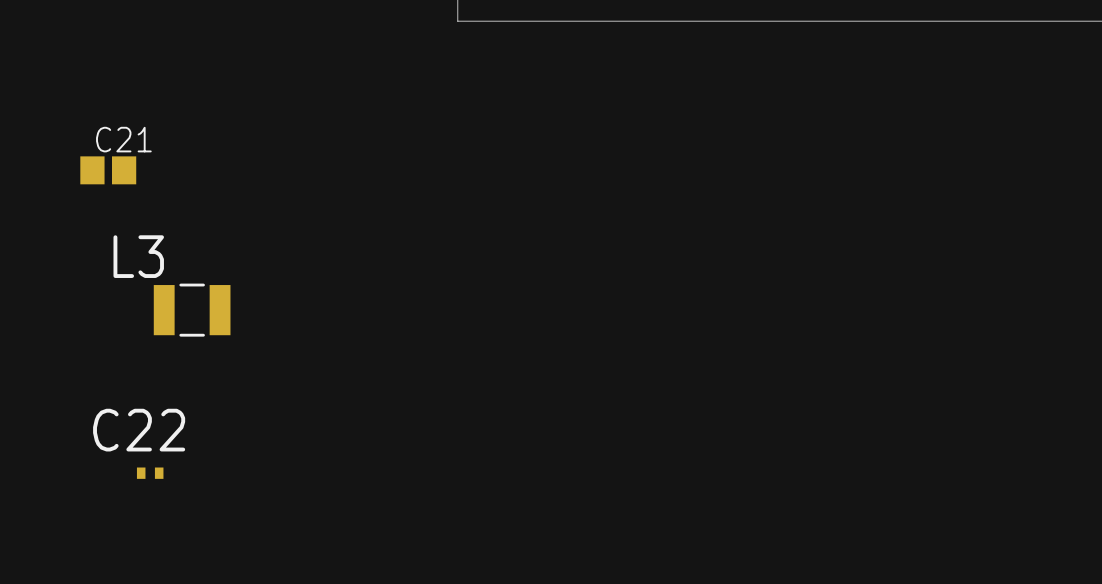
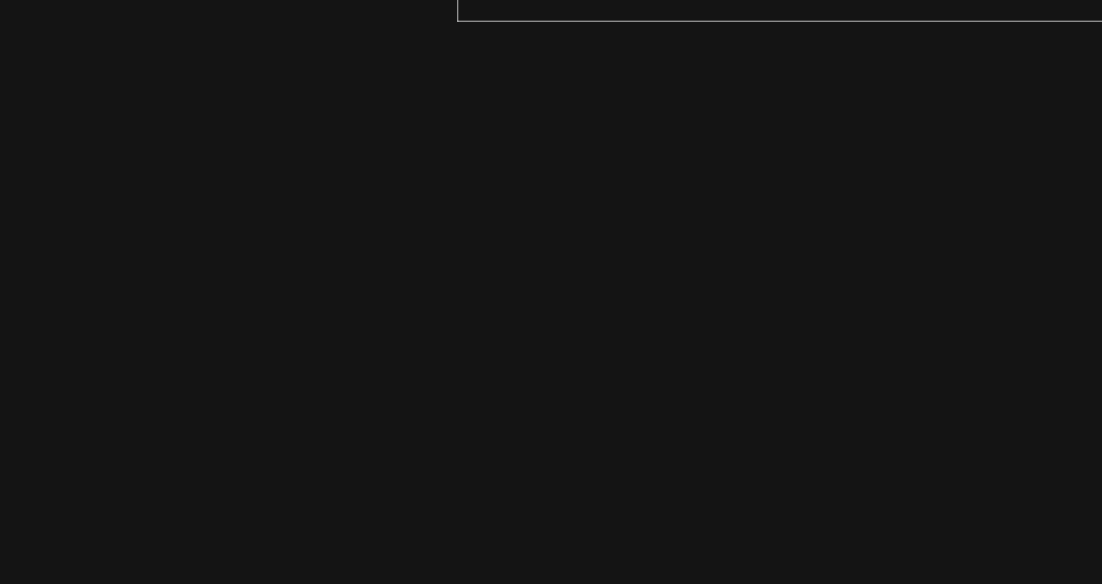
C21: (108, 170) -> none
L3: (192, 310) -> none
C22: (150, 473) -> none

